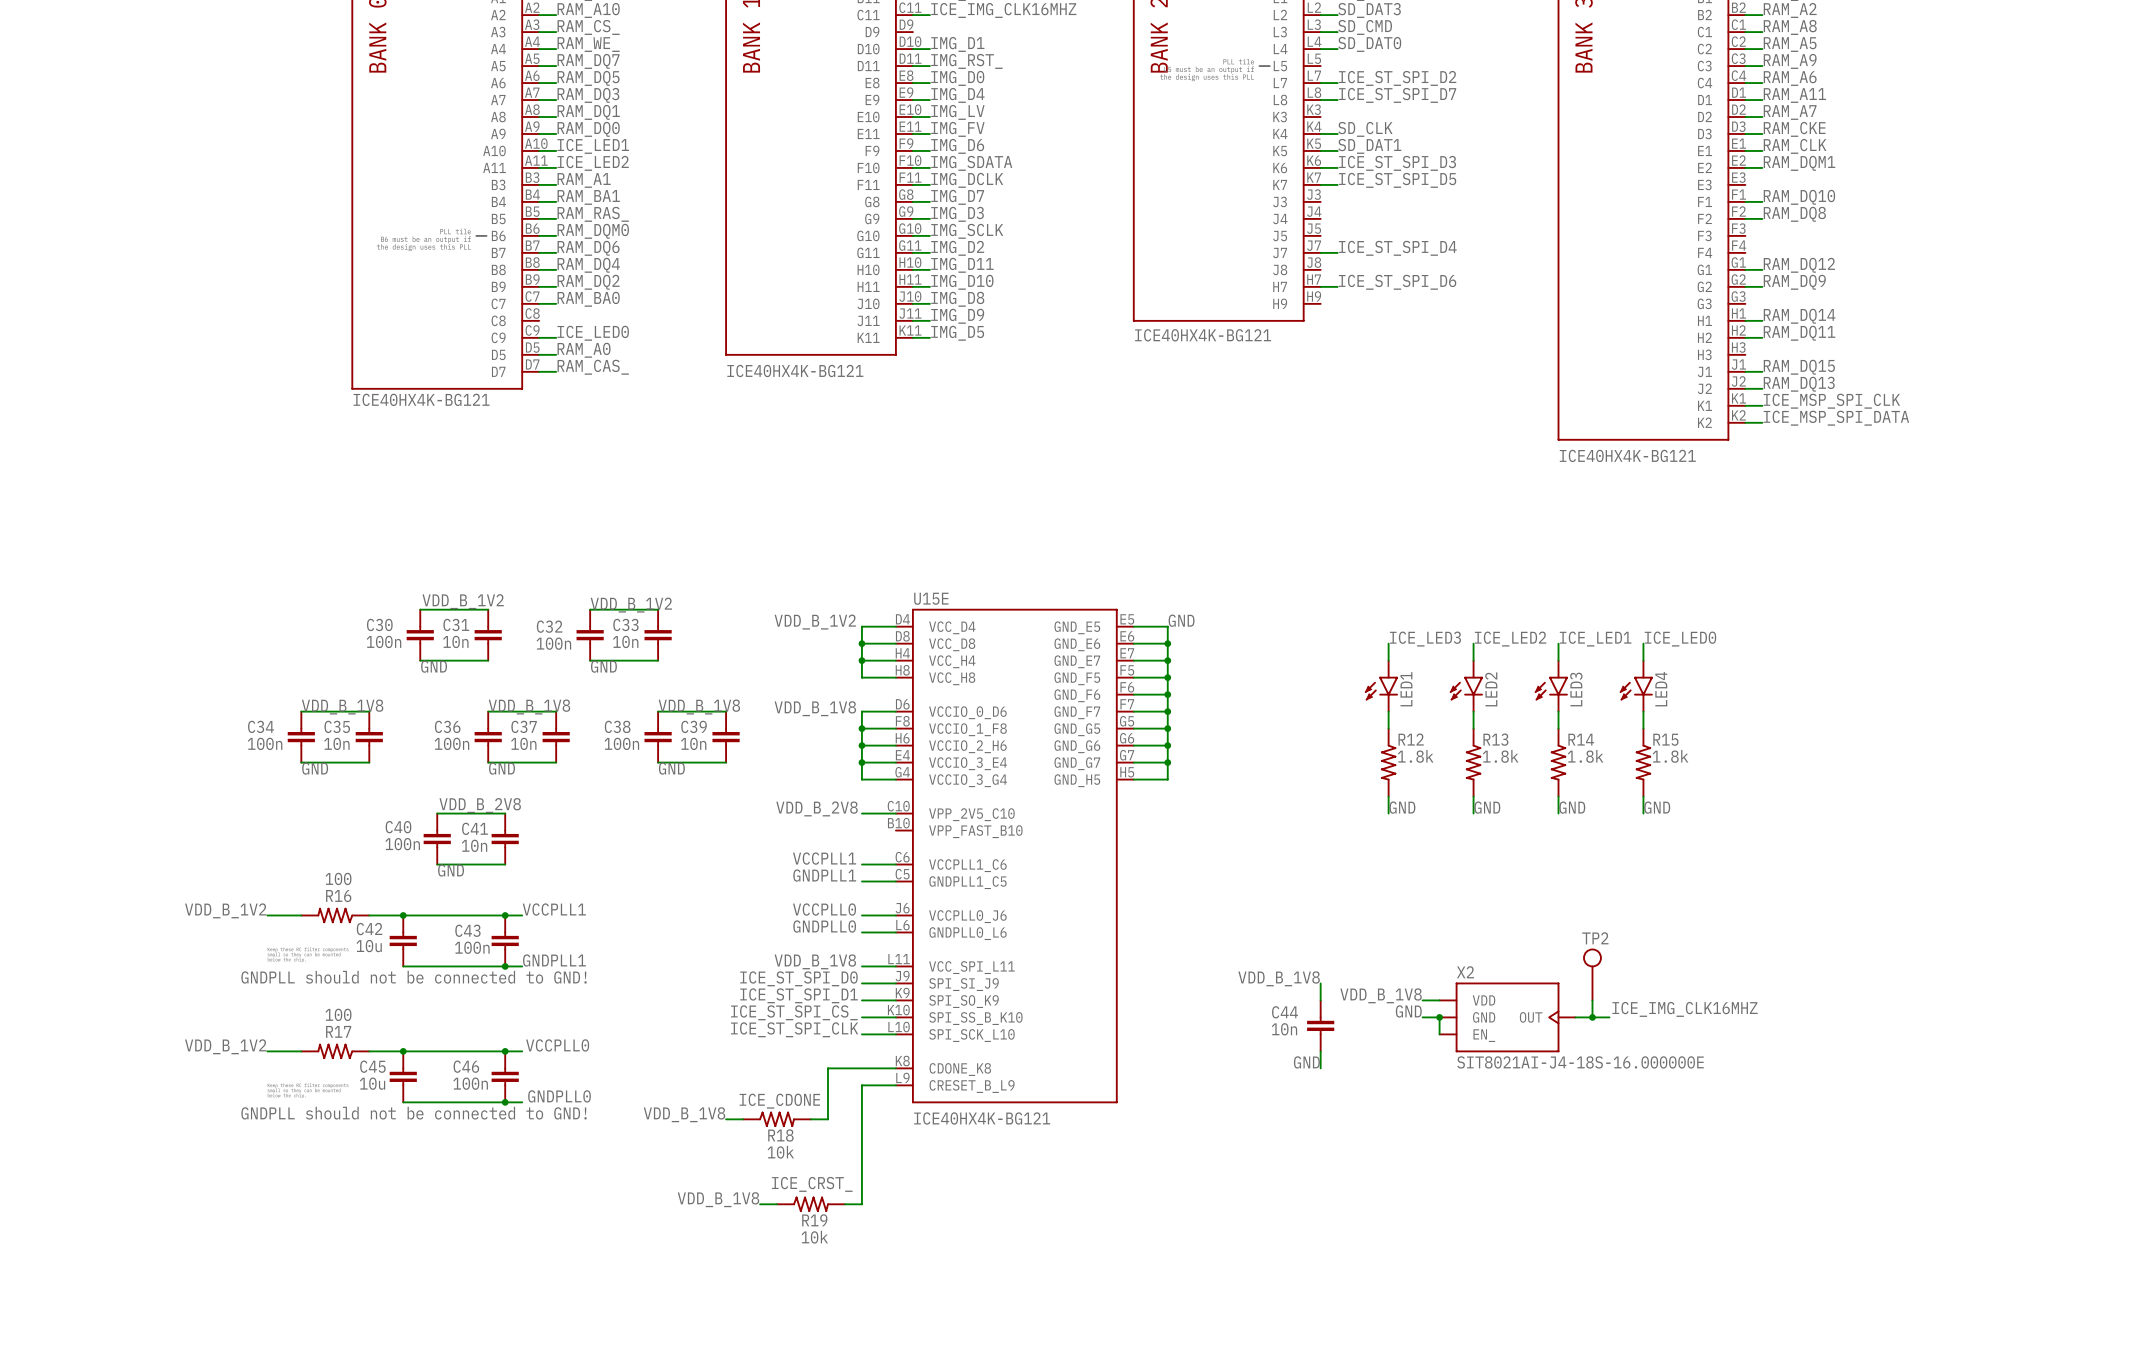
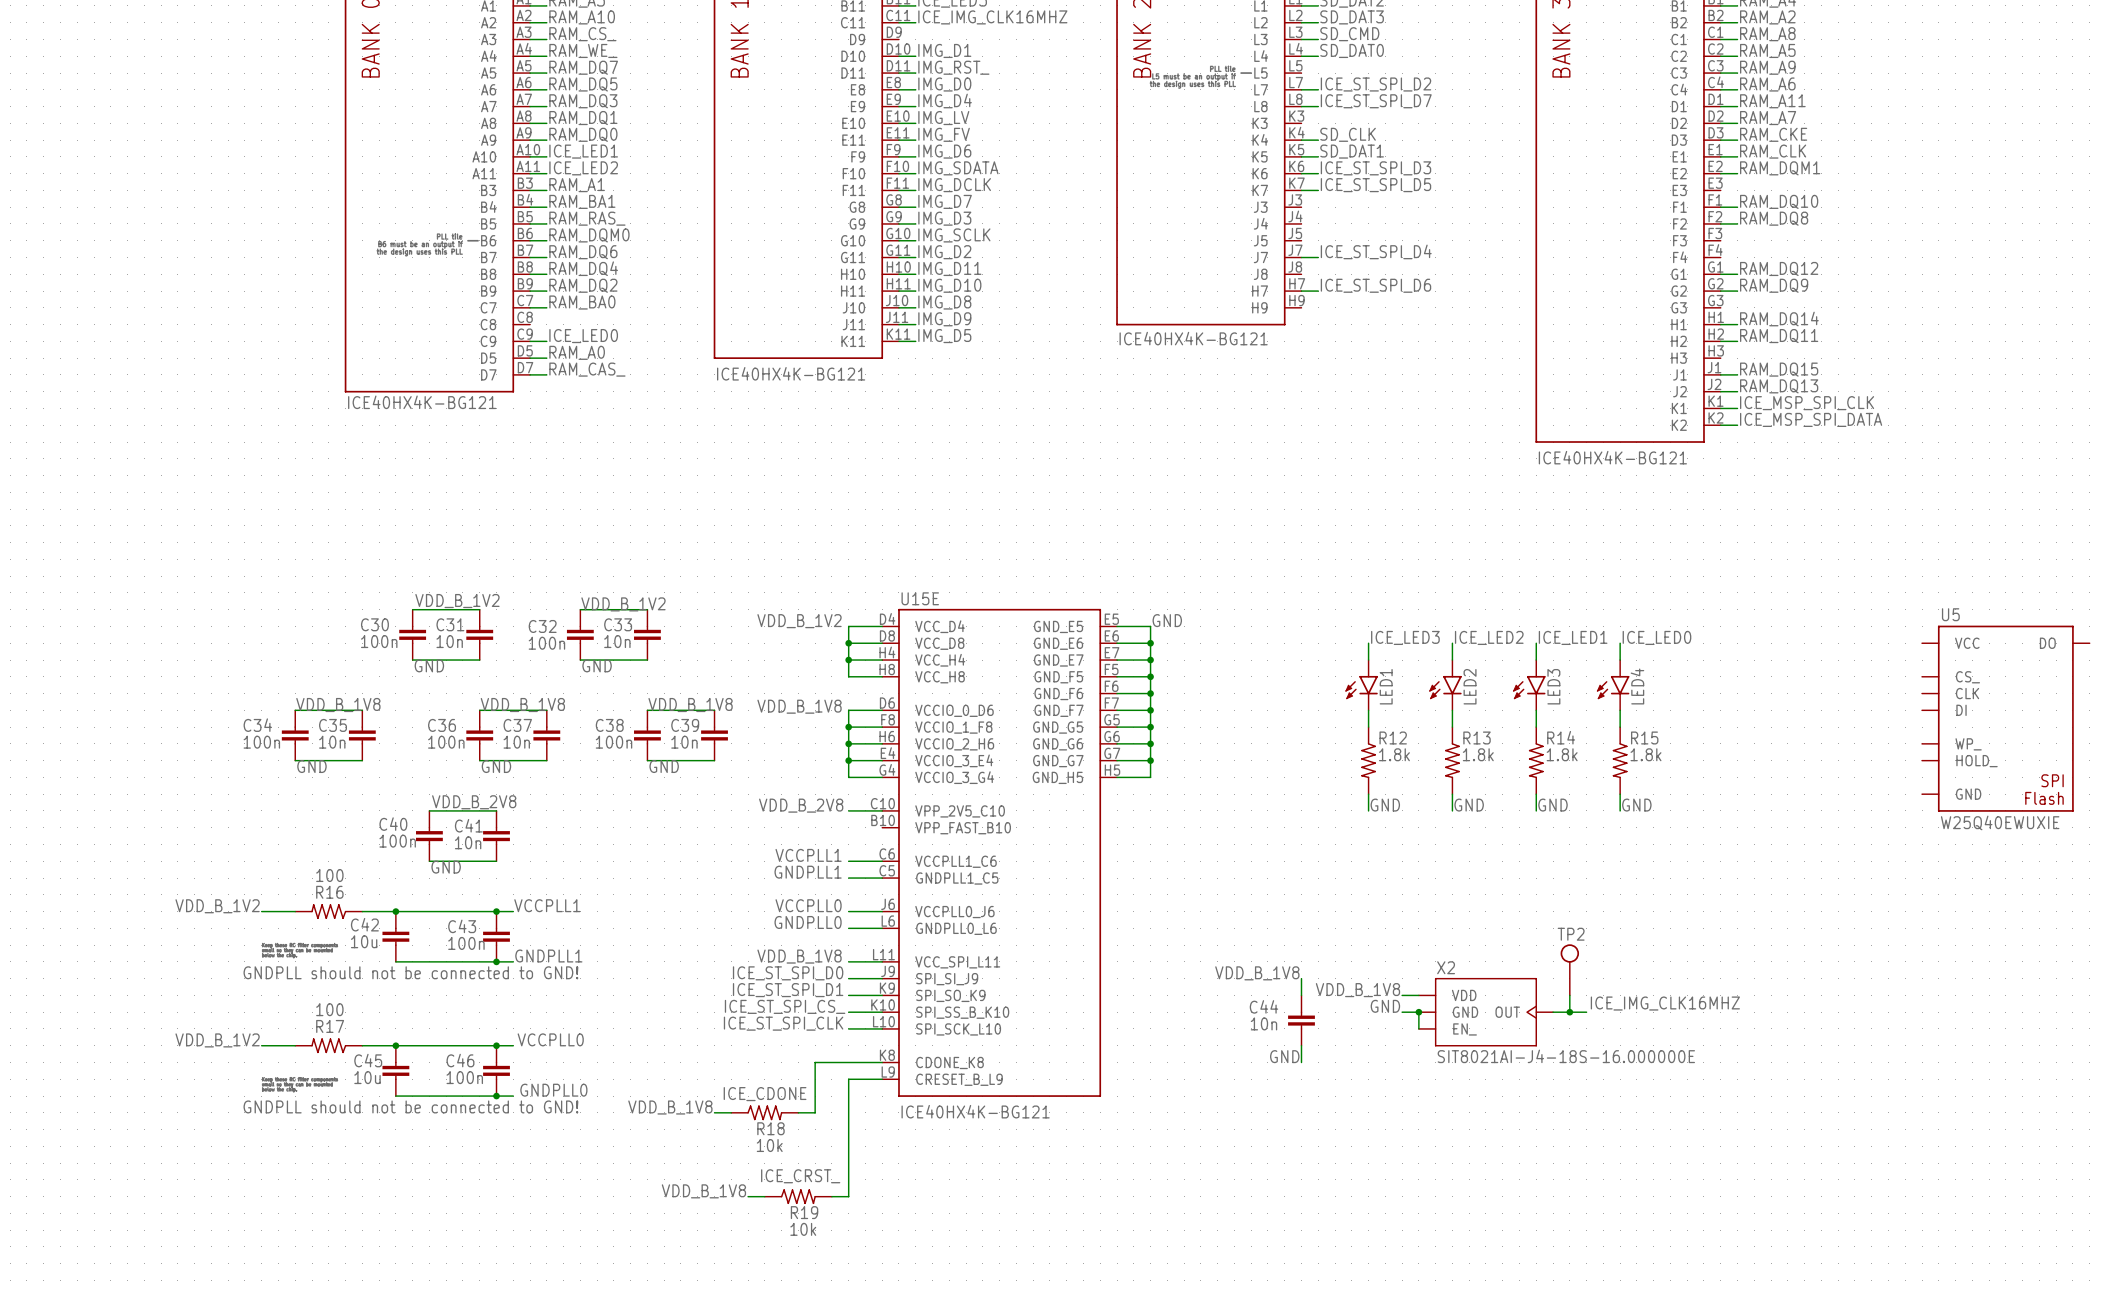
U5: none -> (2005, 718)

